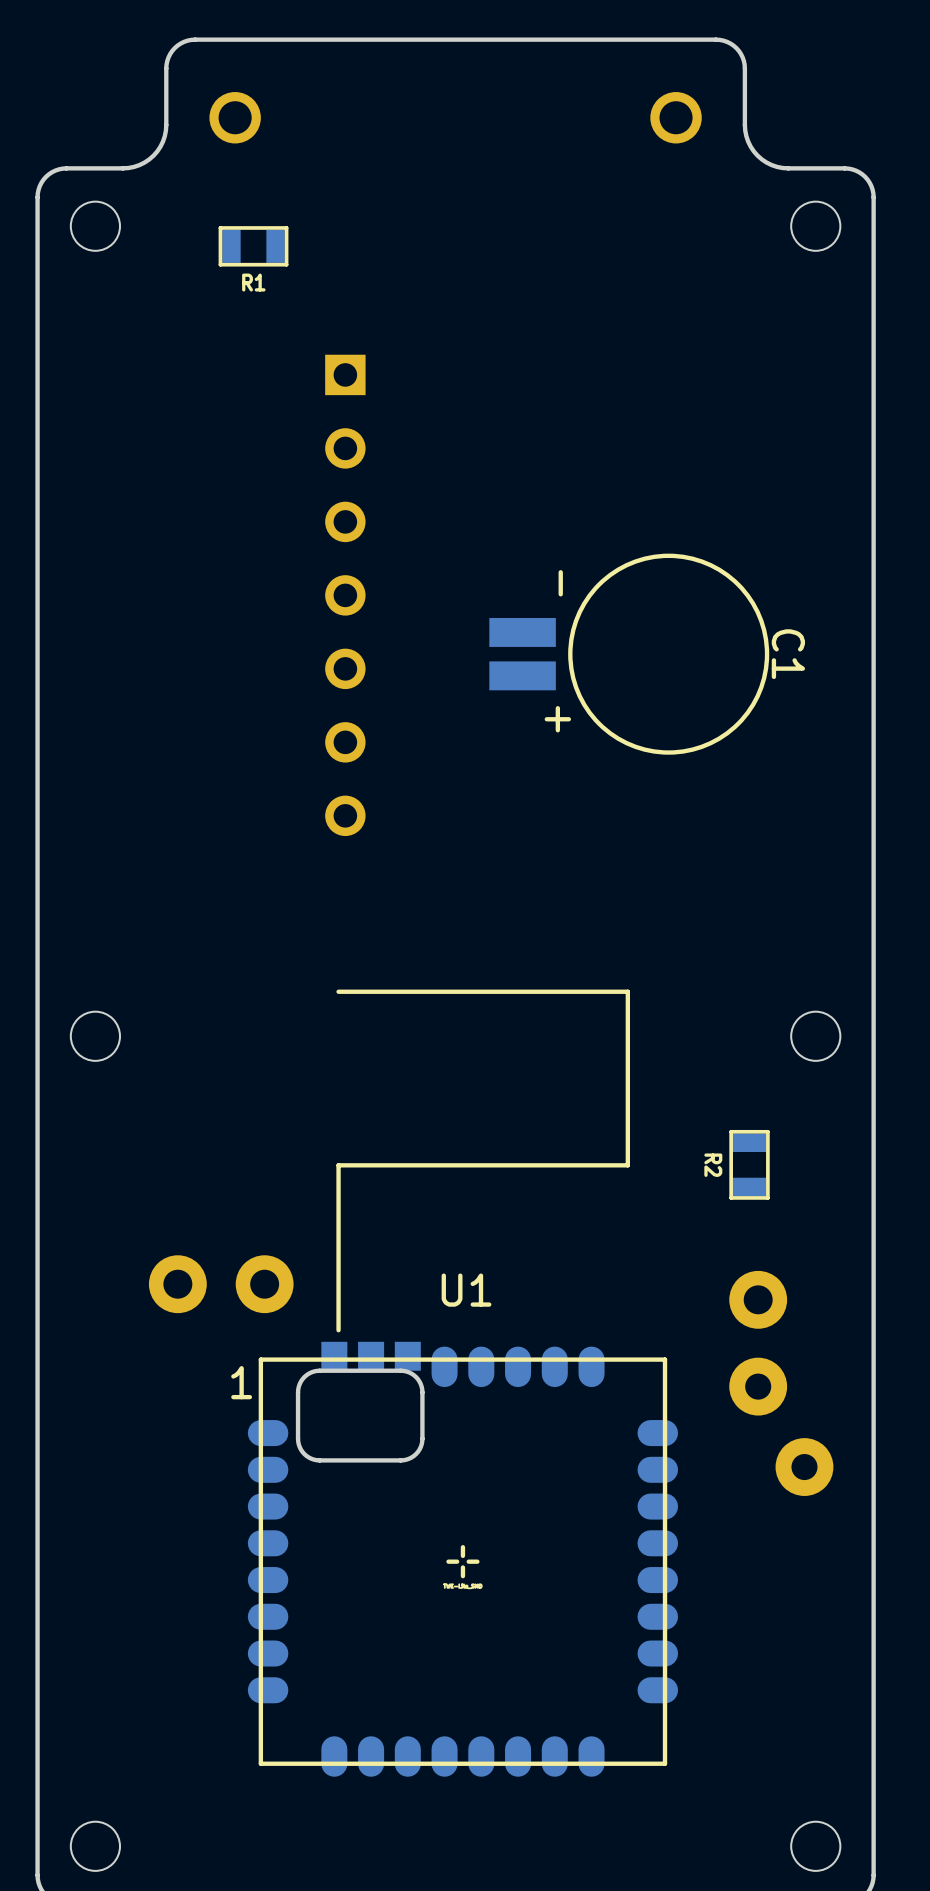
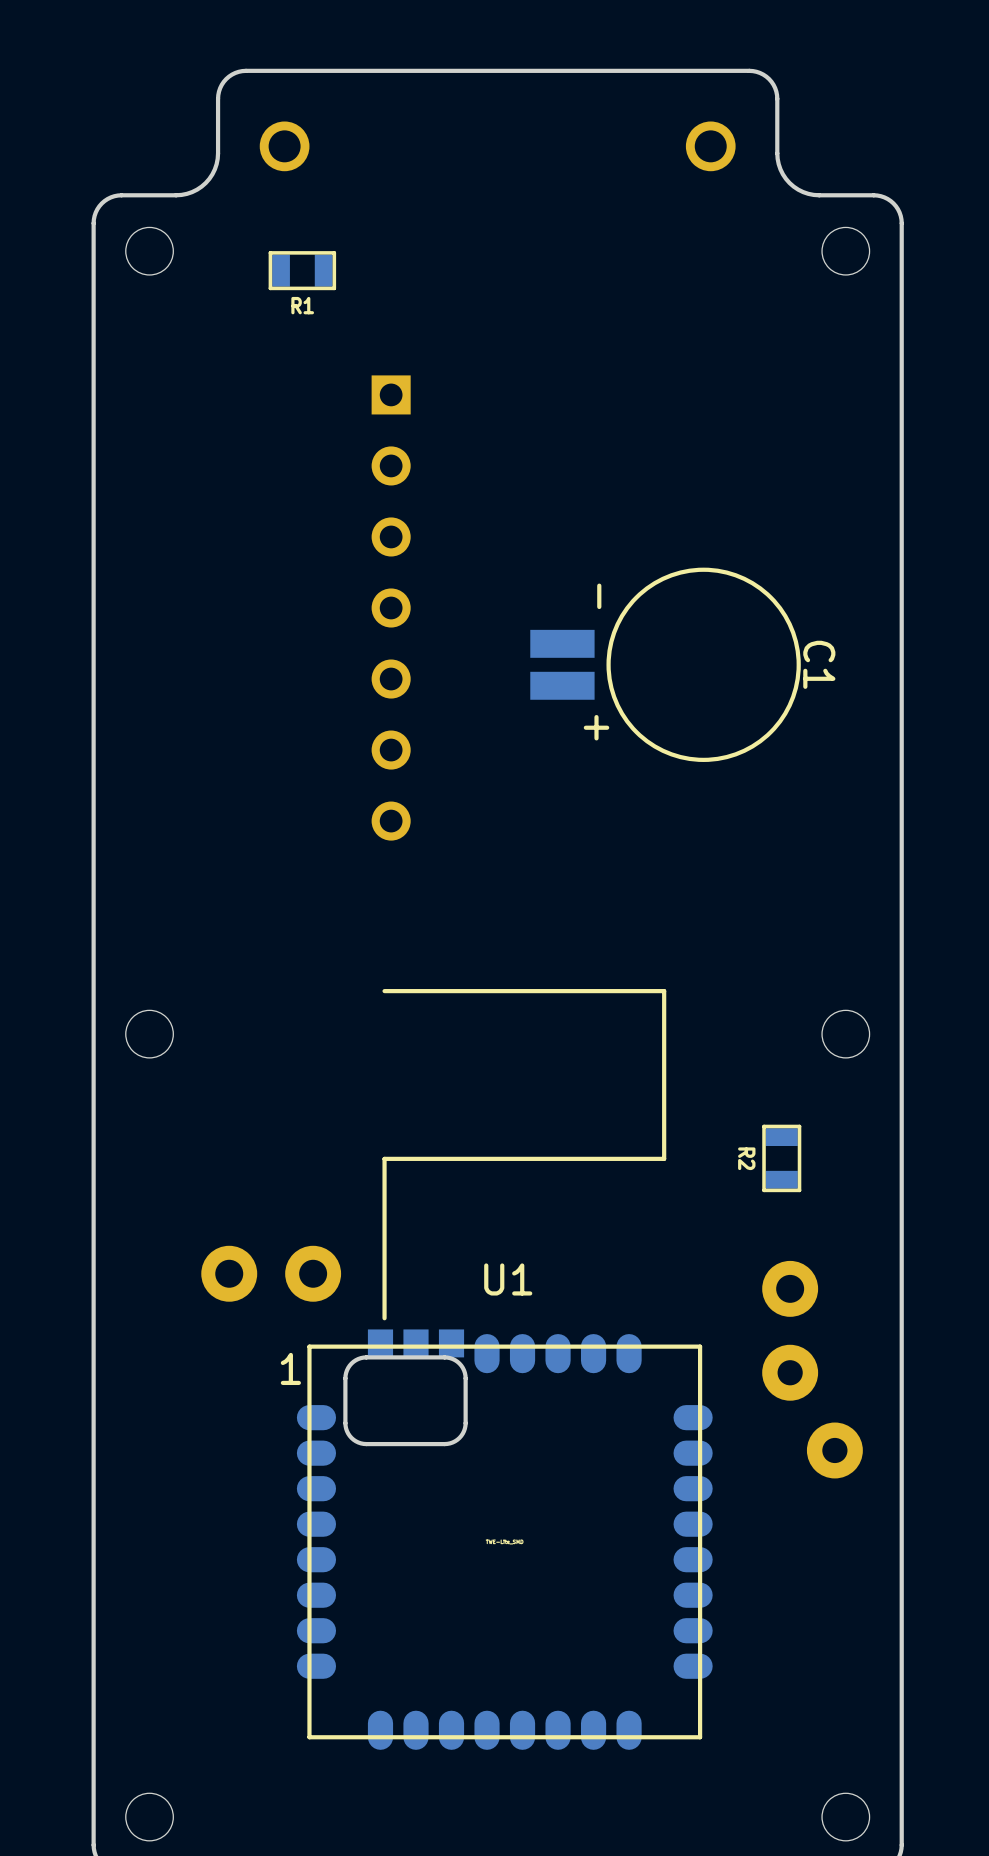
U1 footprint: [247, 989, 679, 1777] -> [296, 989, 713, 1750]

